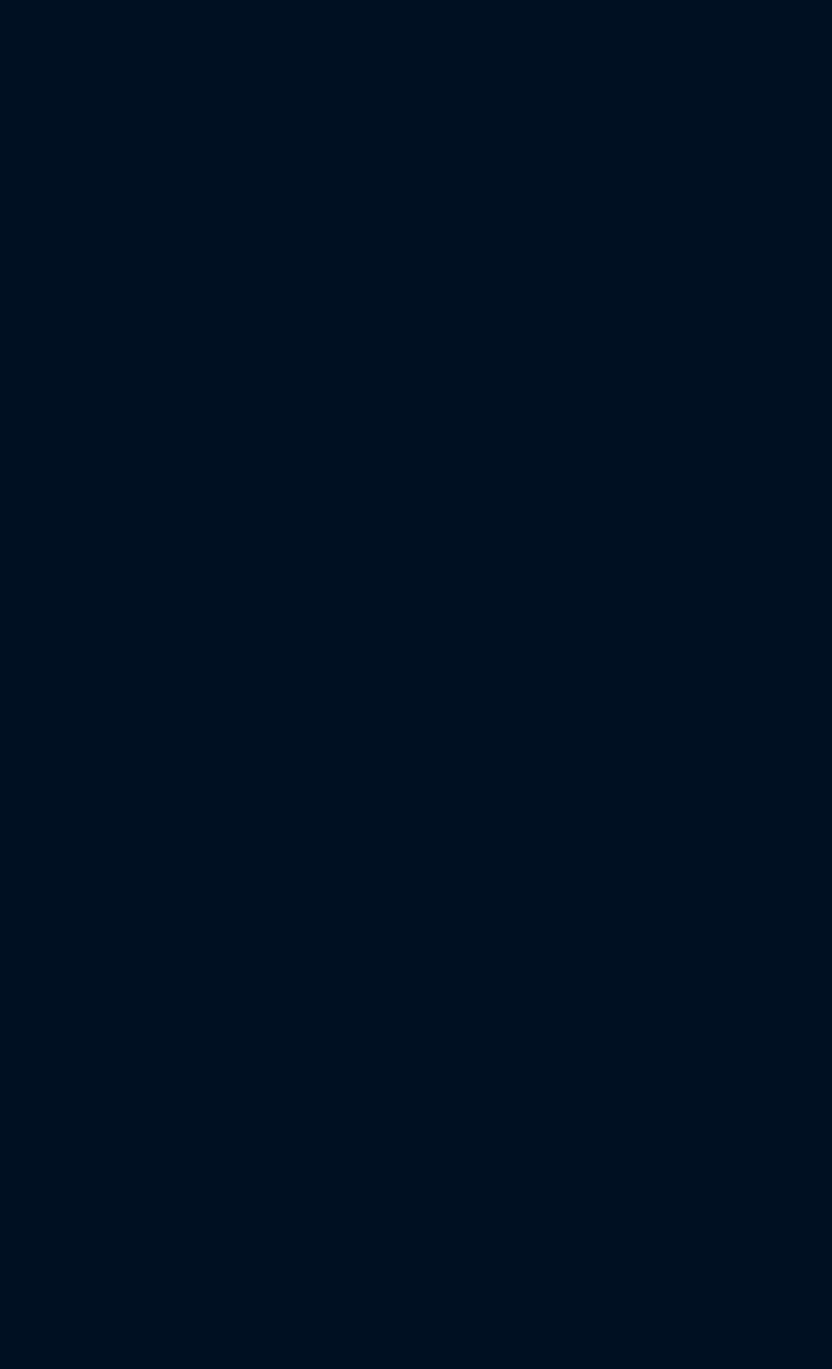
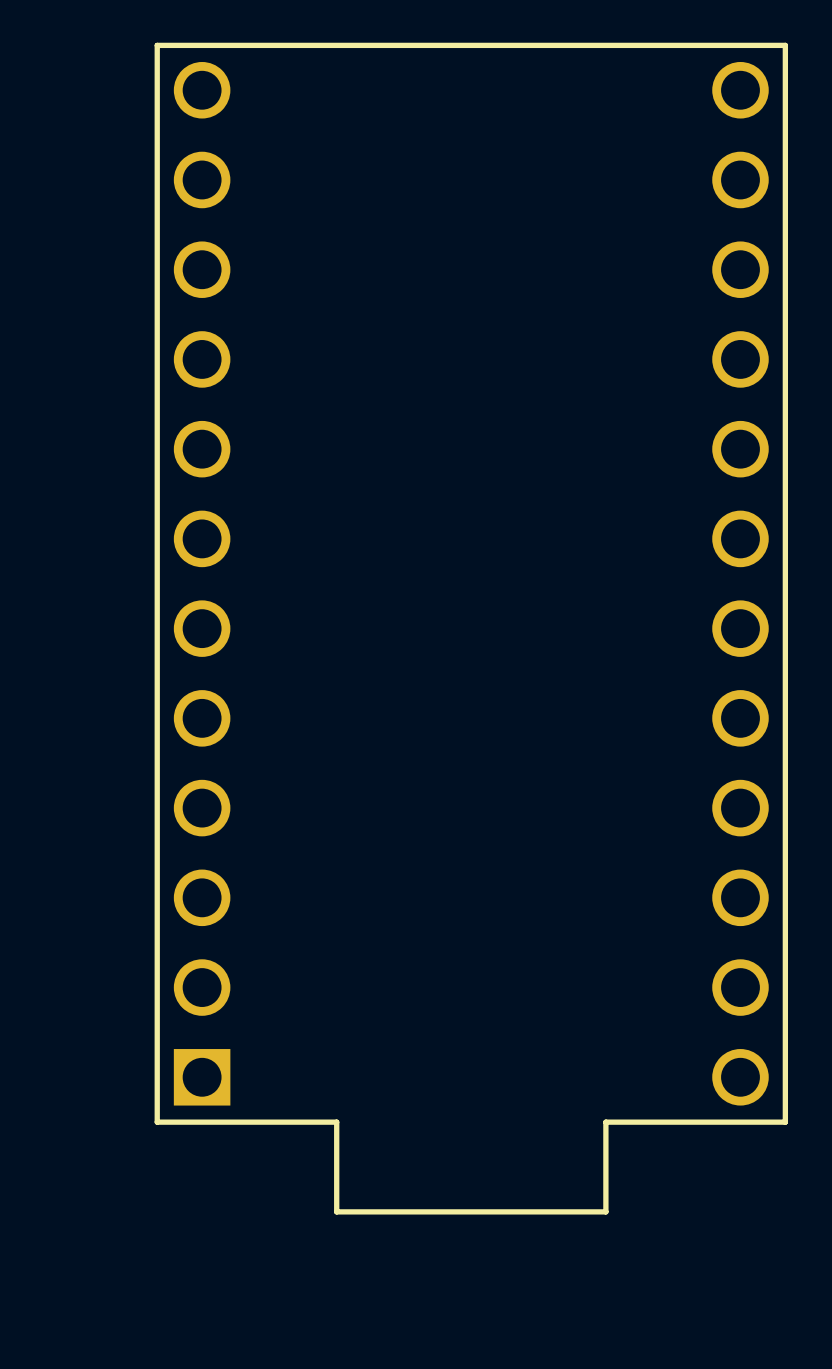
part: none -> (471, 628)

